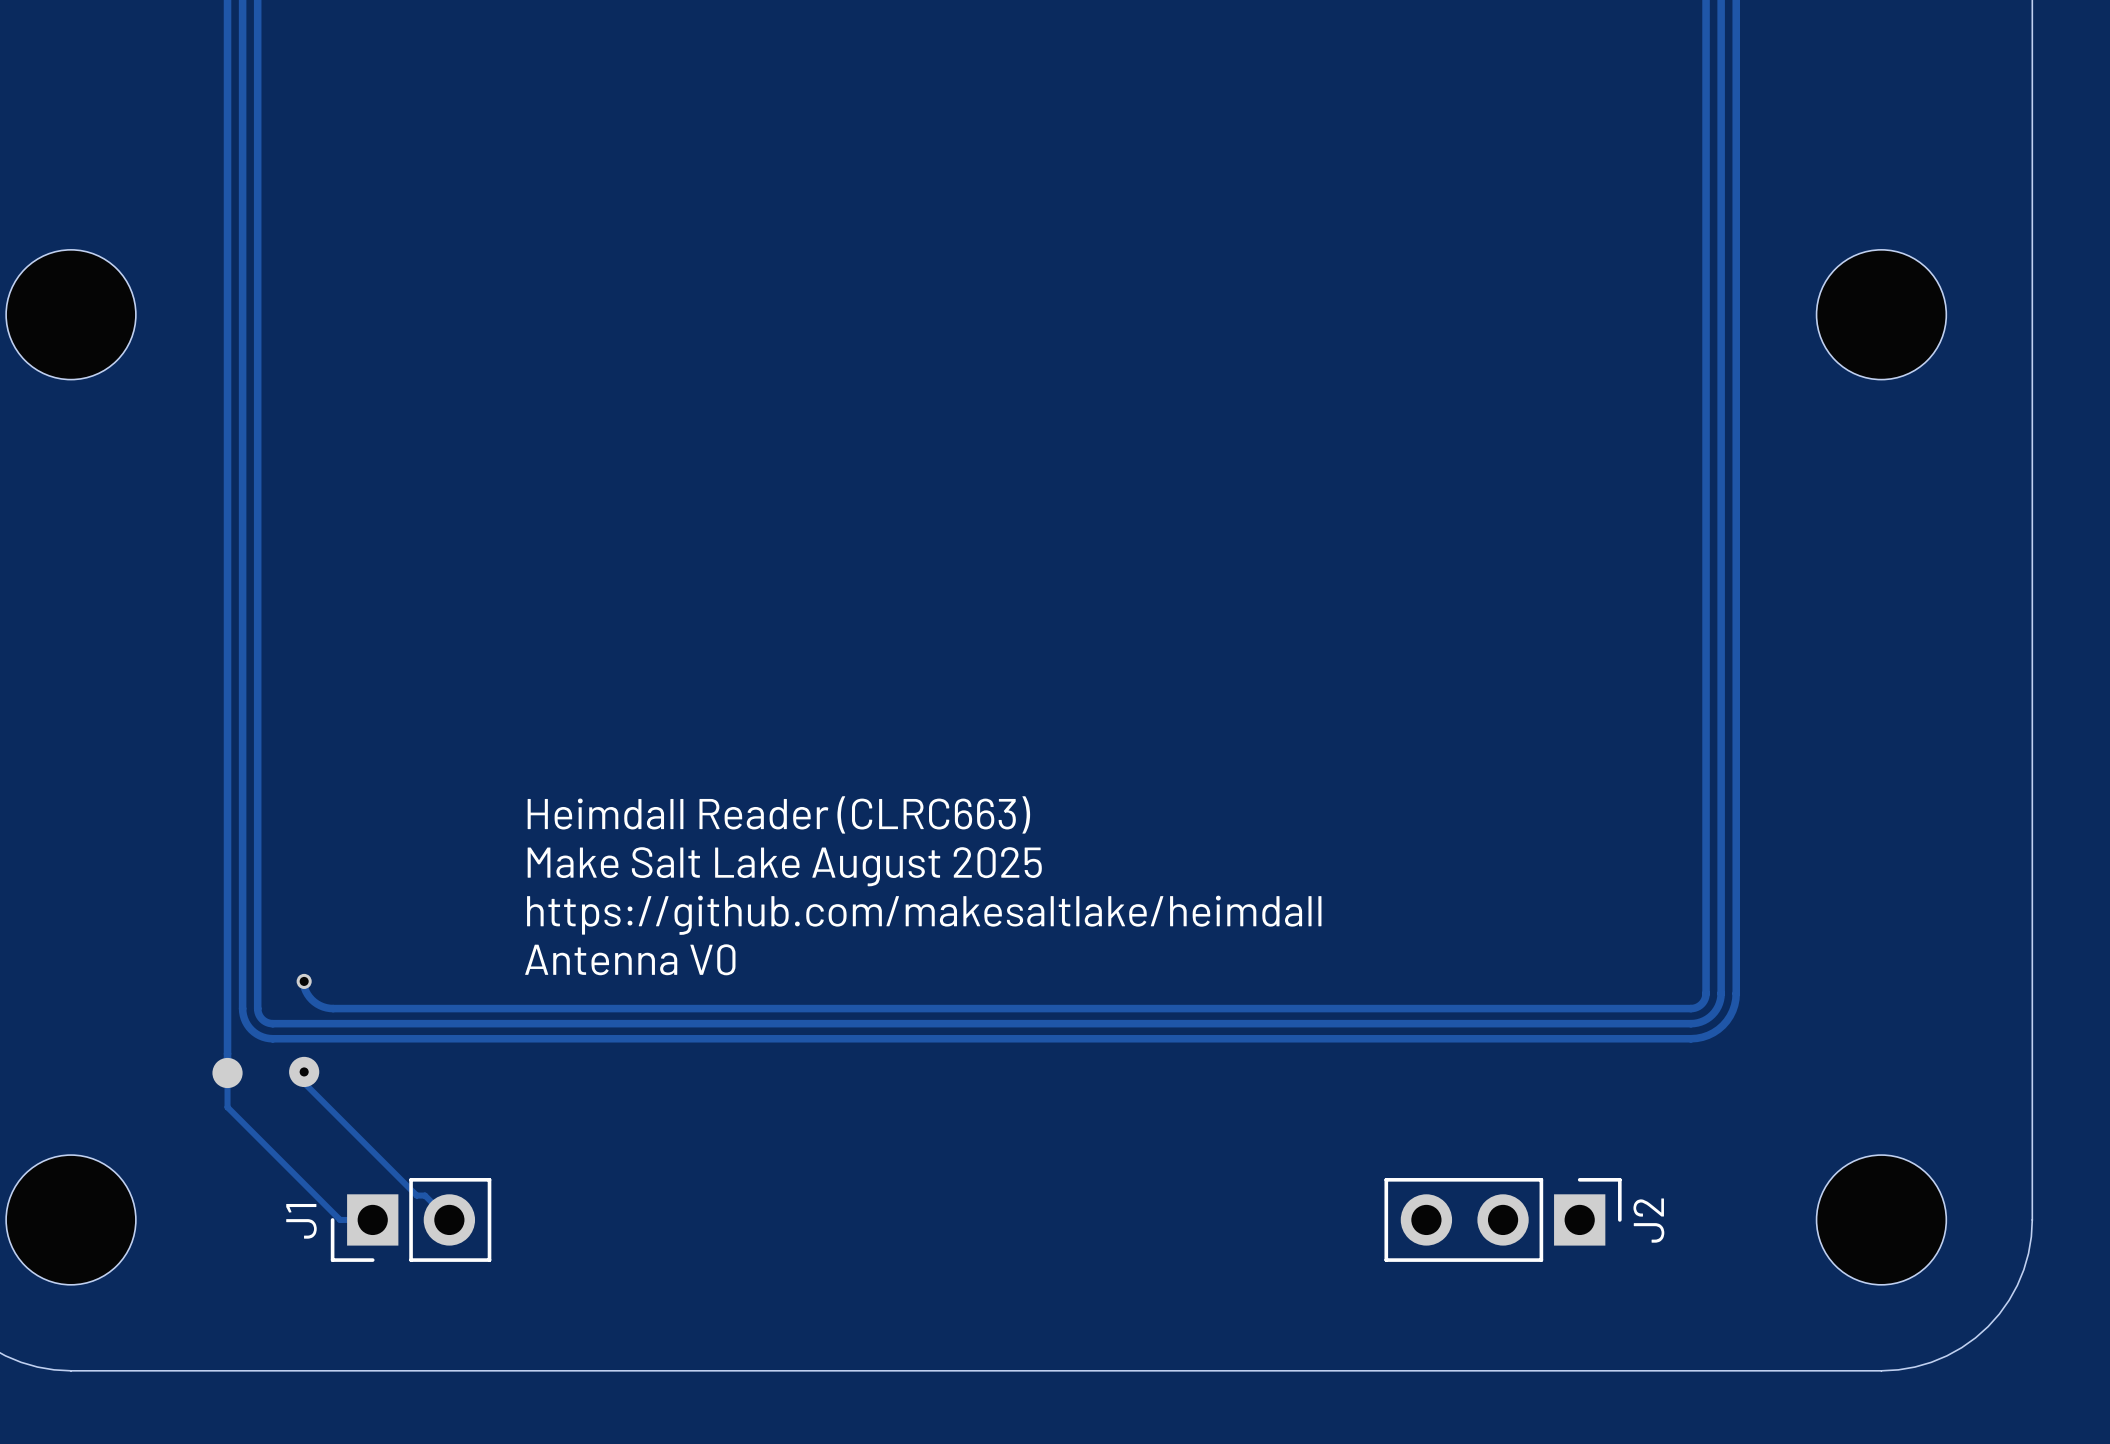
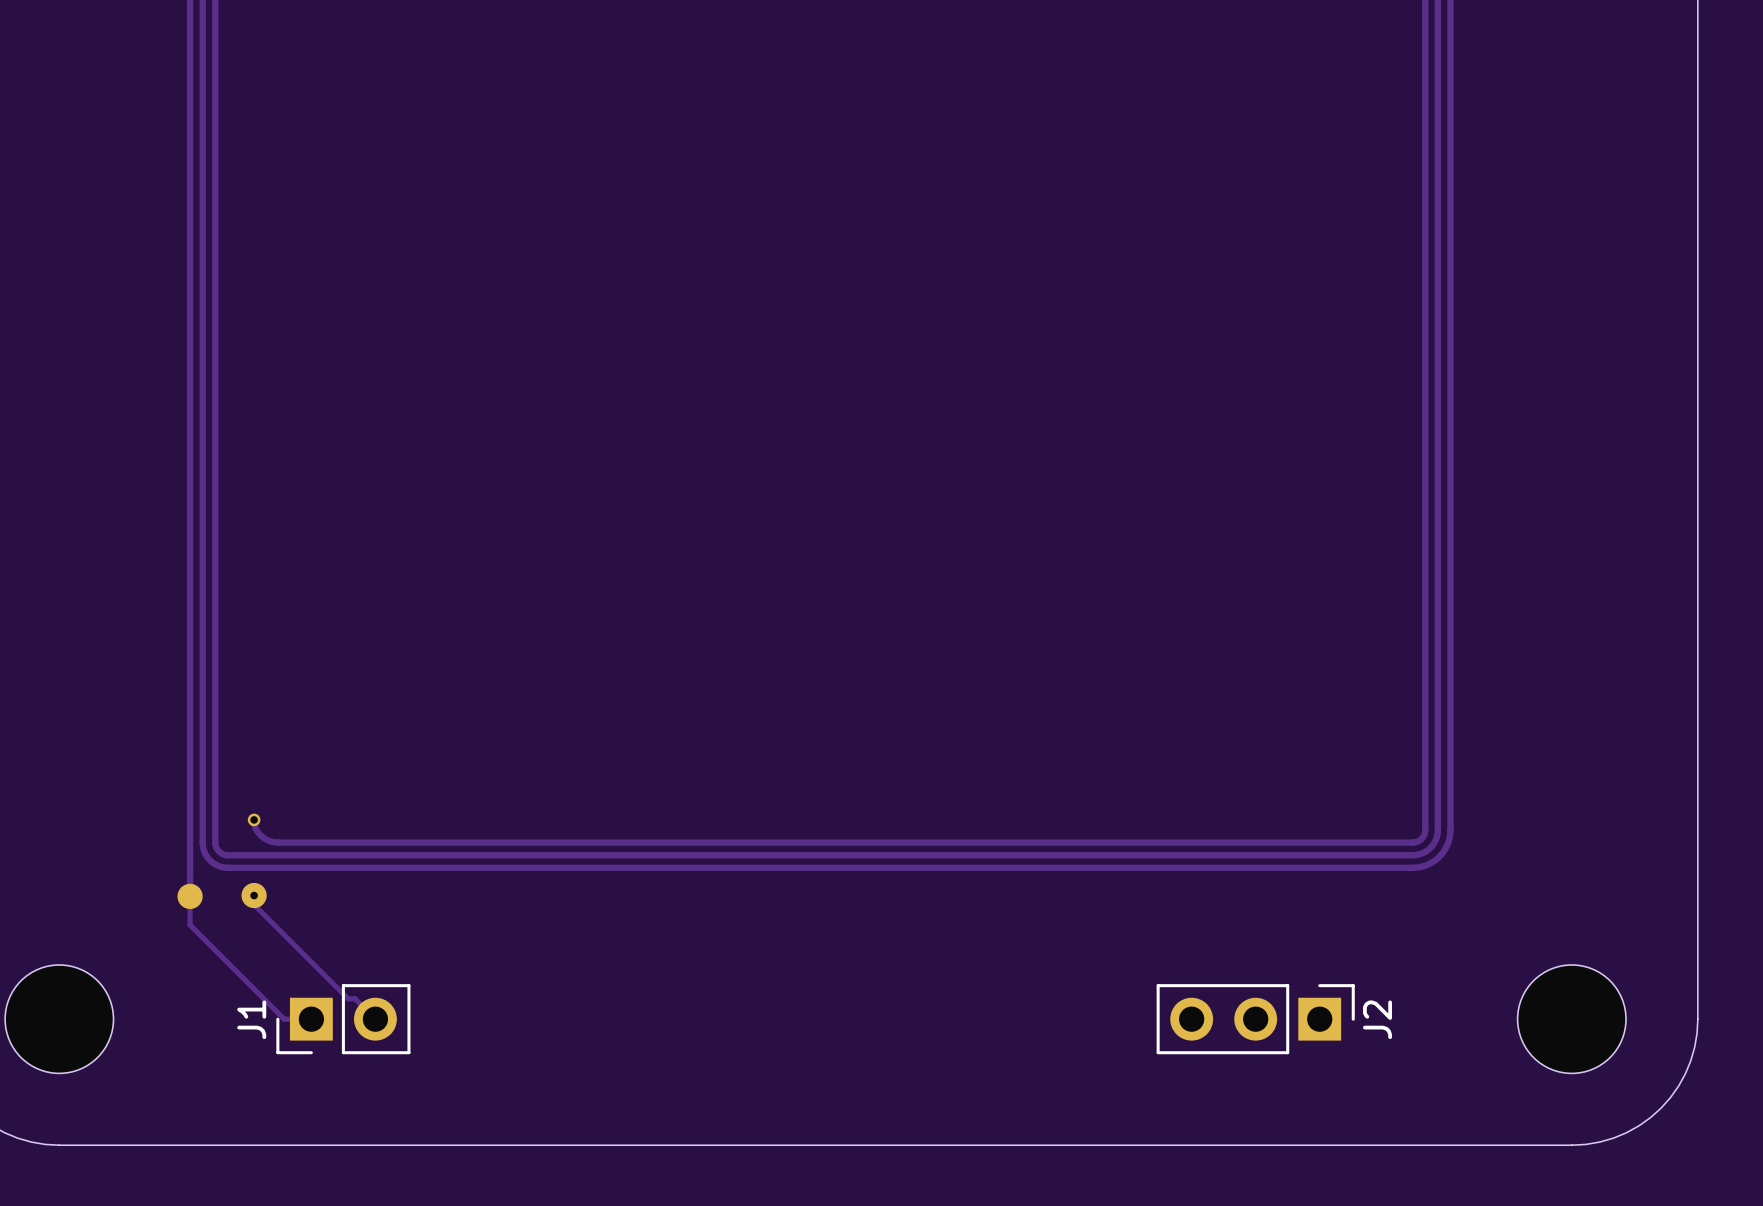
part: (70, 314) -> none
part: (1881, 314) -> none
text: Heimdall Reader (CLRC663) (778, 814) -> none
text: Make Salt Lake August 2025 (784, 866) -> none
text: https://github.com/makesaltlake/heimdall (924, 915) -> none
text: Antenna V0 (630, 959) -> none

